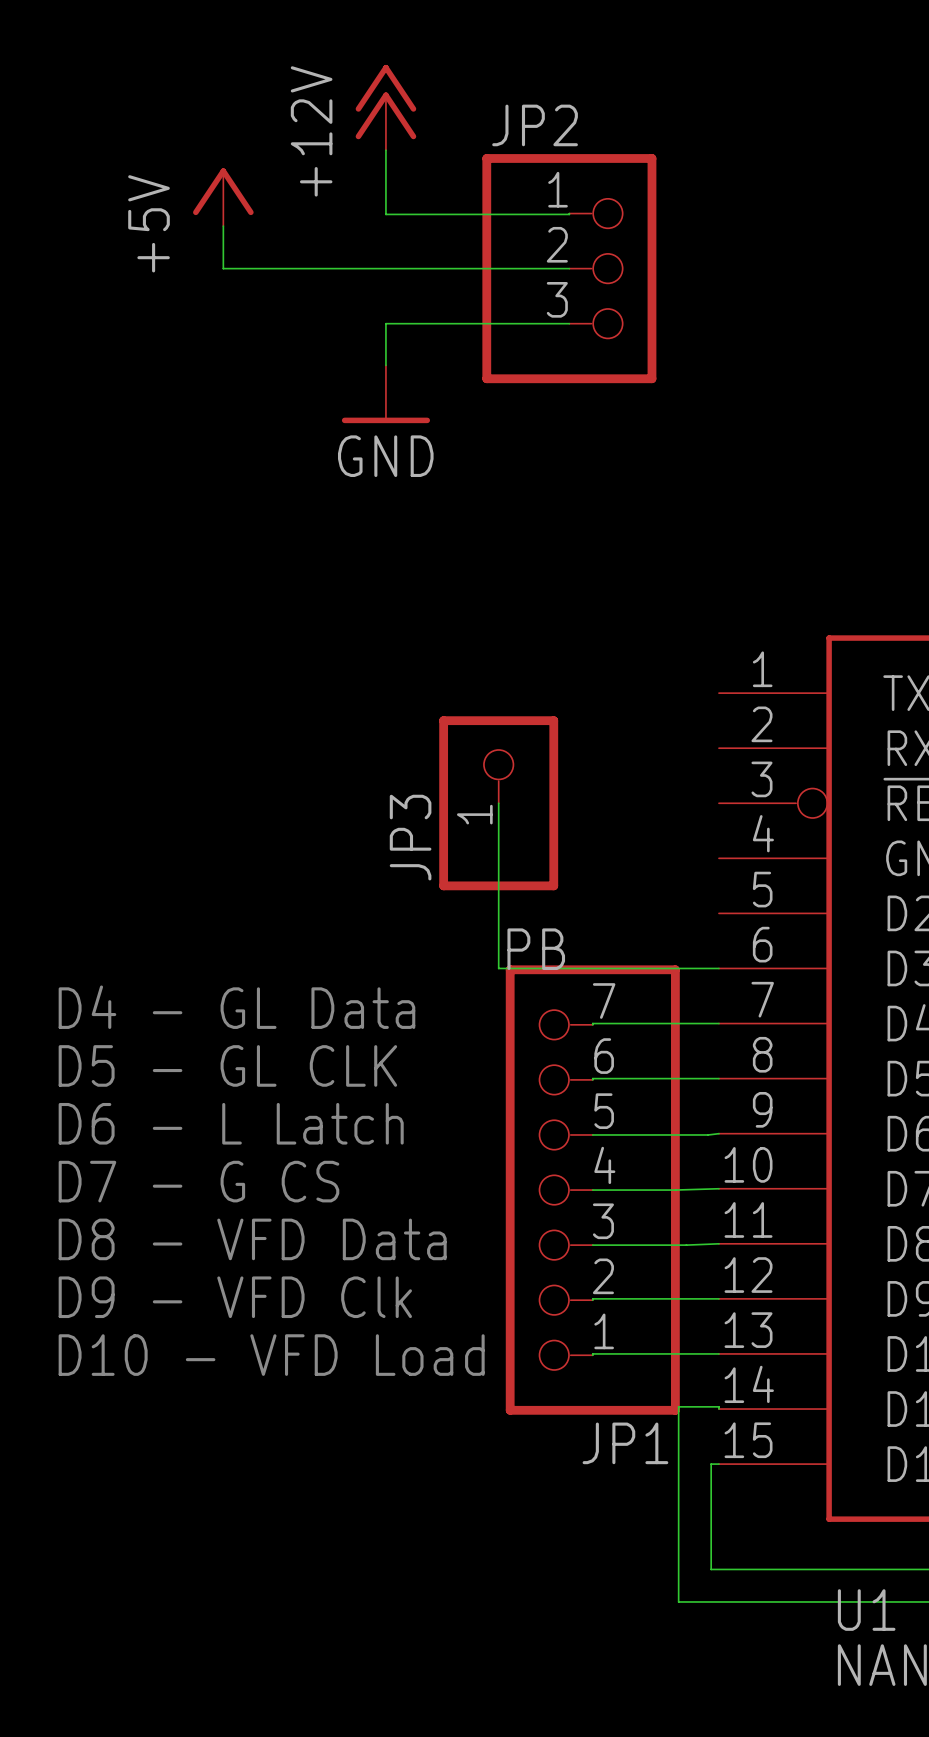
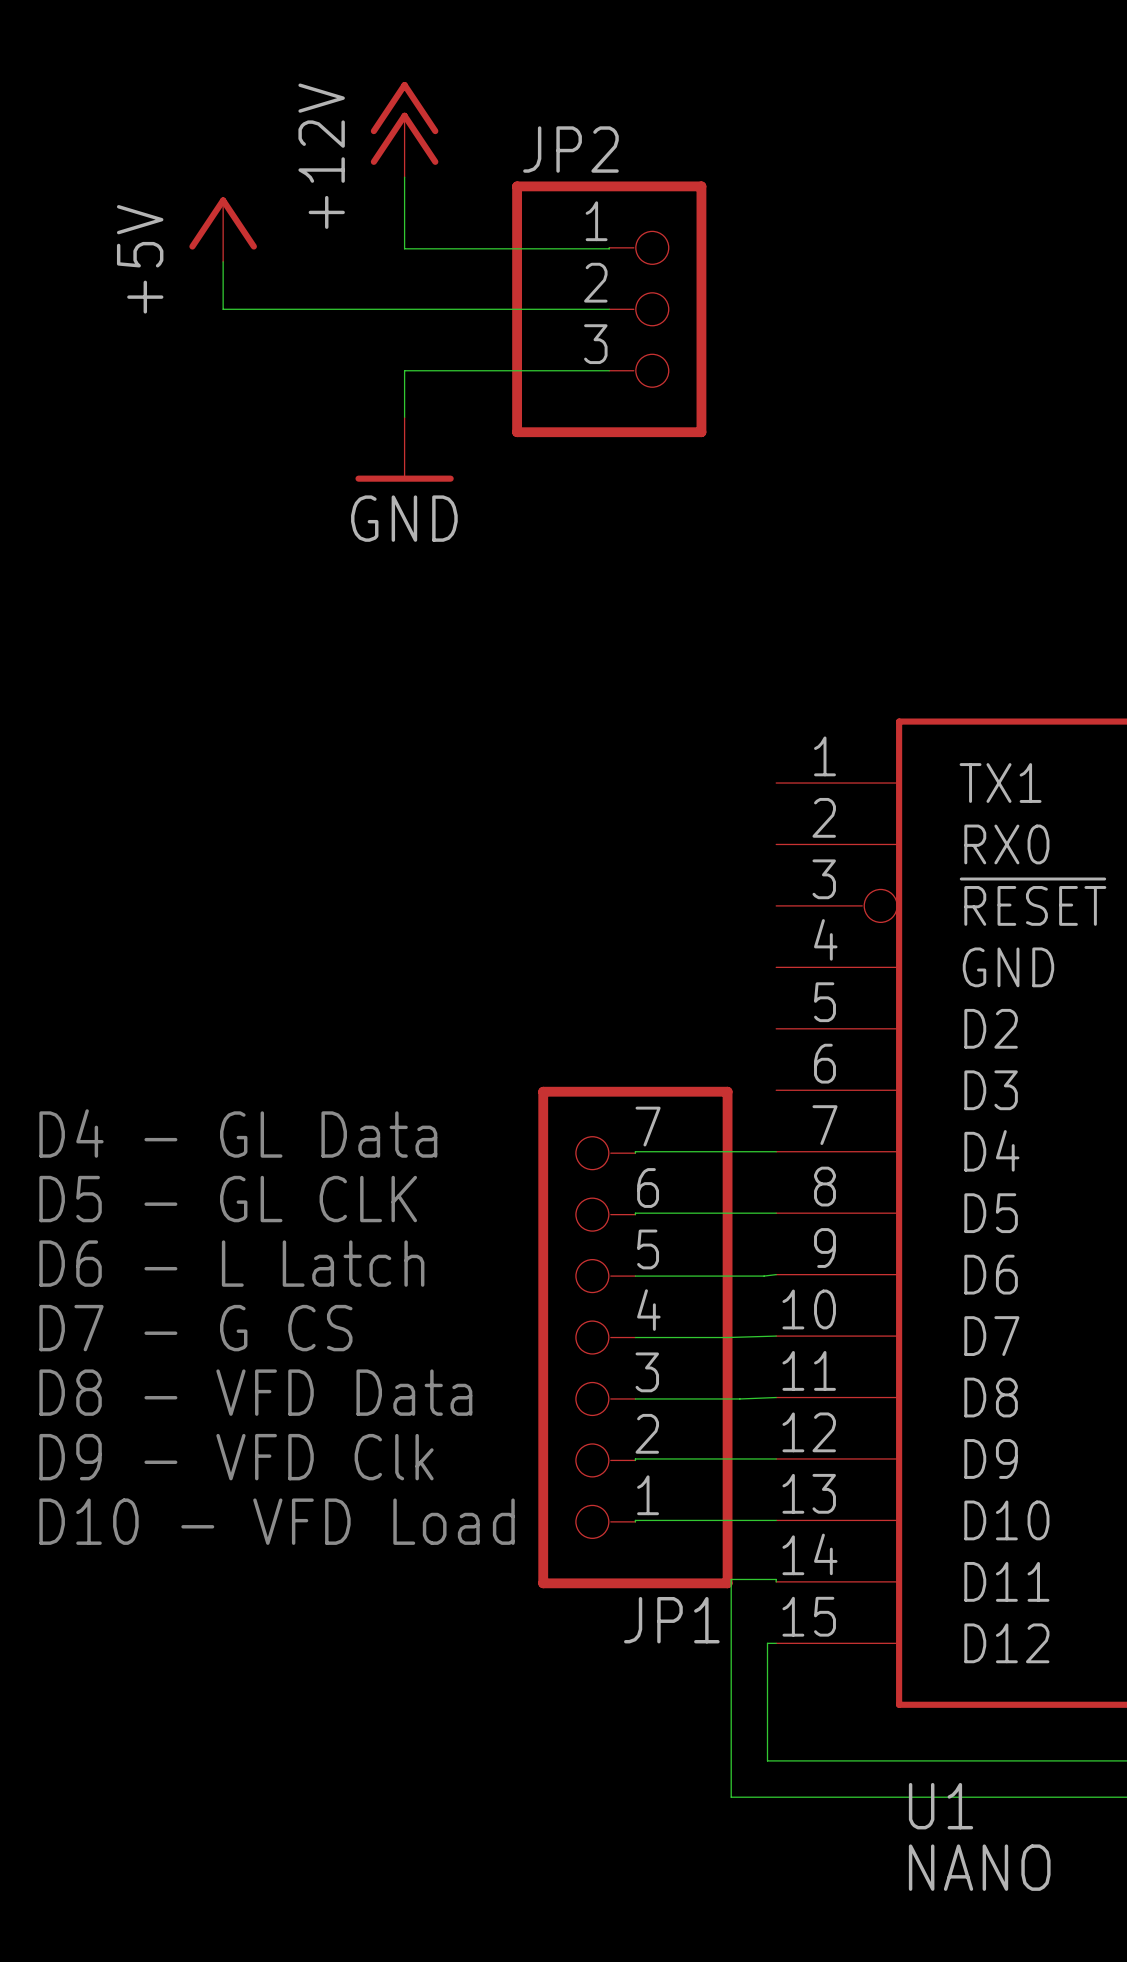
wire: (498, 803) (498, 968) (718, 968) -> none
JP3: (498, 803) -> none
label: PB (536, 949) -> none

